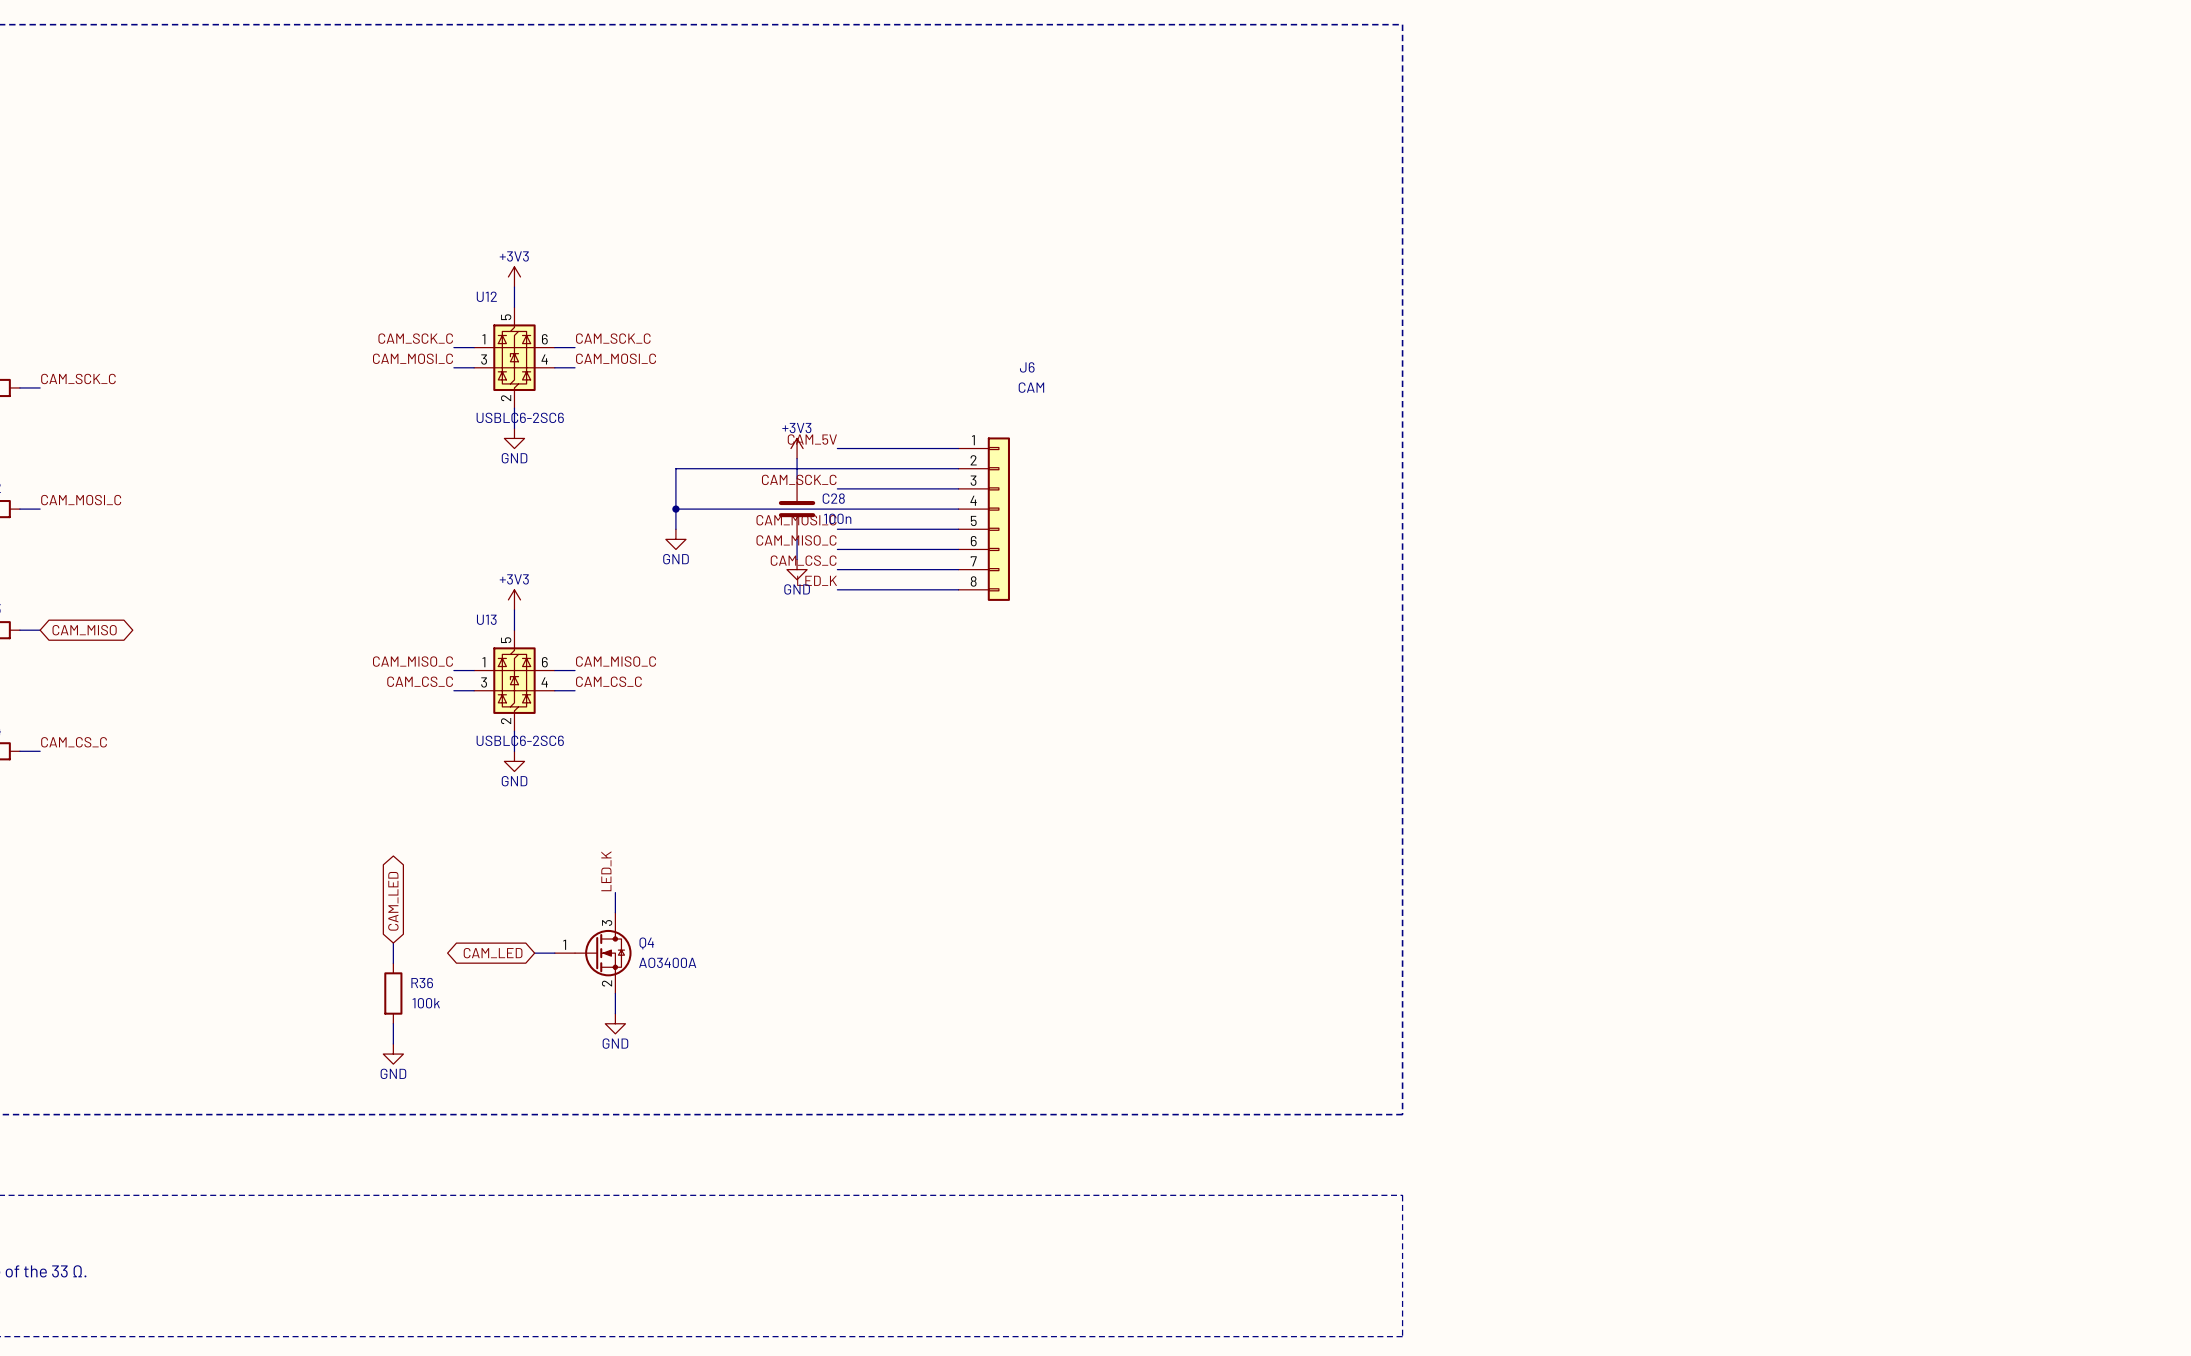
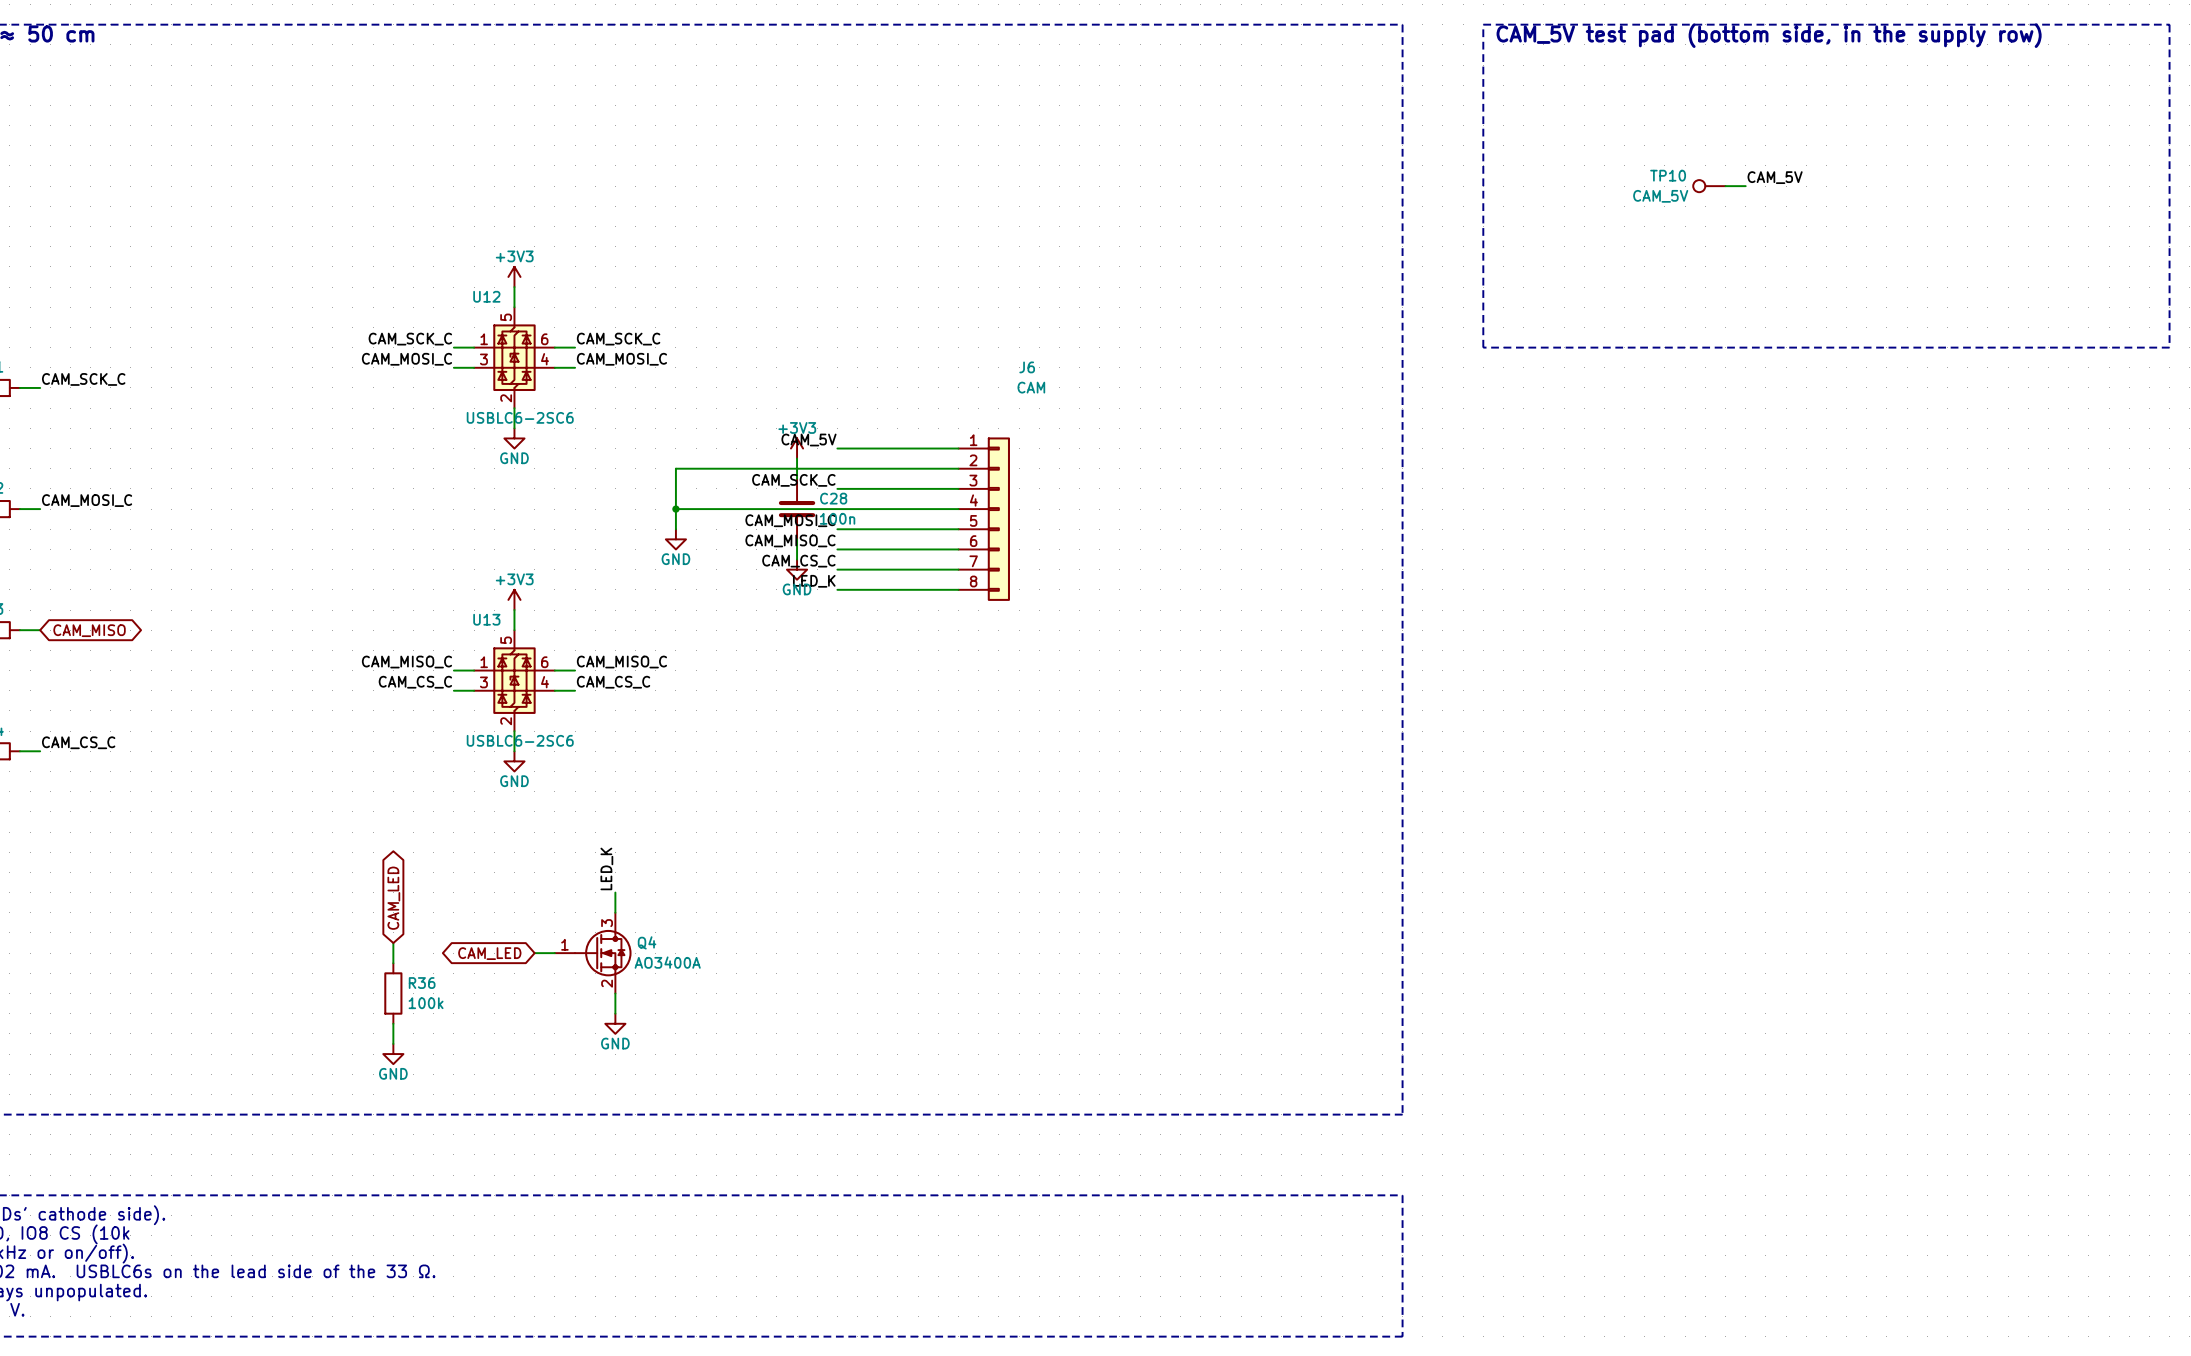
line: none -> (1483, 24) (2169, 24) (2169, 347) (1483, 347) (1483, 24)
text: none -> CAM_5V test pad (bottom side, in the supply row) (1769, 35)
label: none -> CAM_5V (1775, 177)
TP10: none -> CAM_5V (1709, 186)
wire: none -> (1725, 186) (1745, 186)

